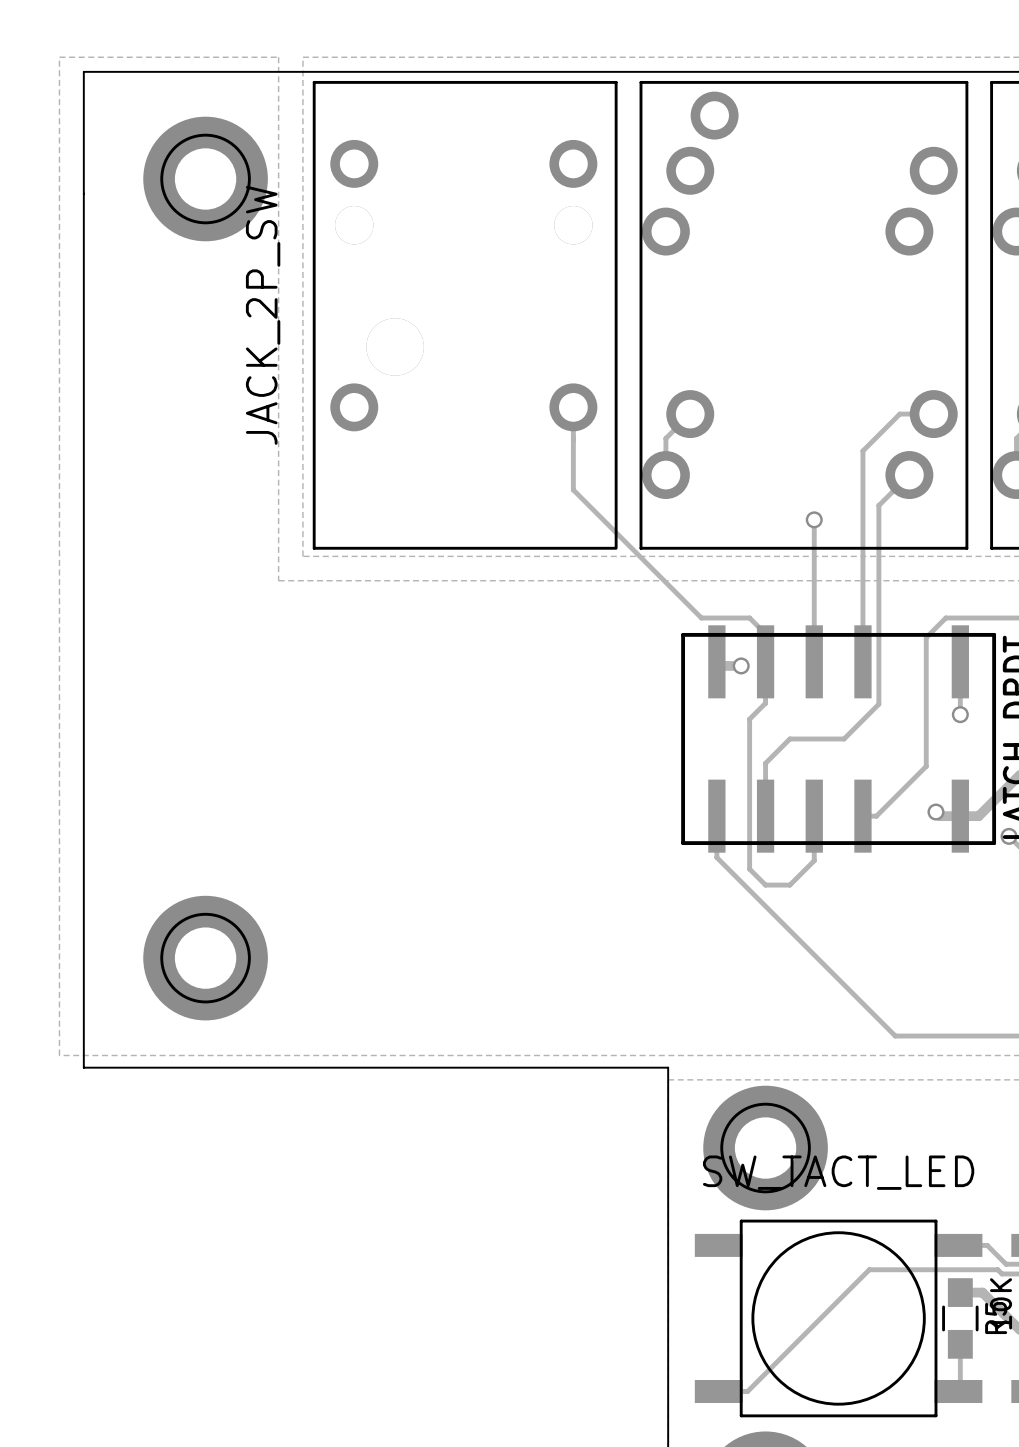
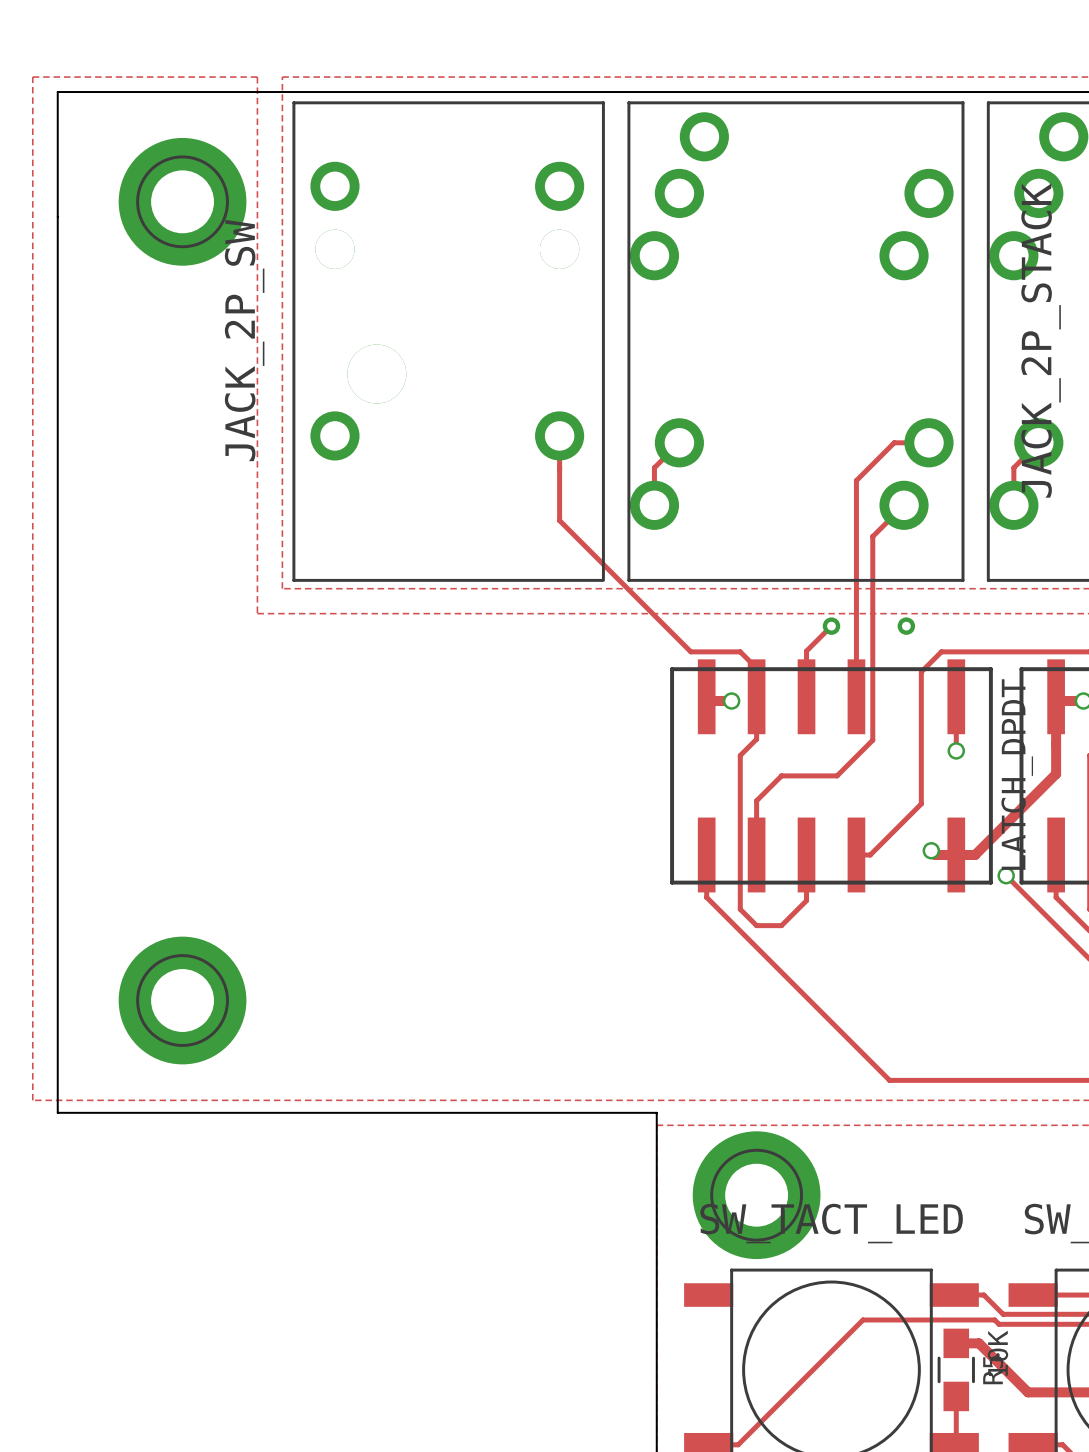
track: (814, 519) (814, 617) -> (831, 626) (806, 651)
via: (814, 519) -> none
via: none -> (831, 626)
via: none -> (906, 626)

